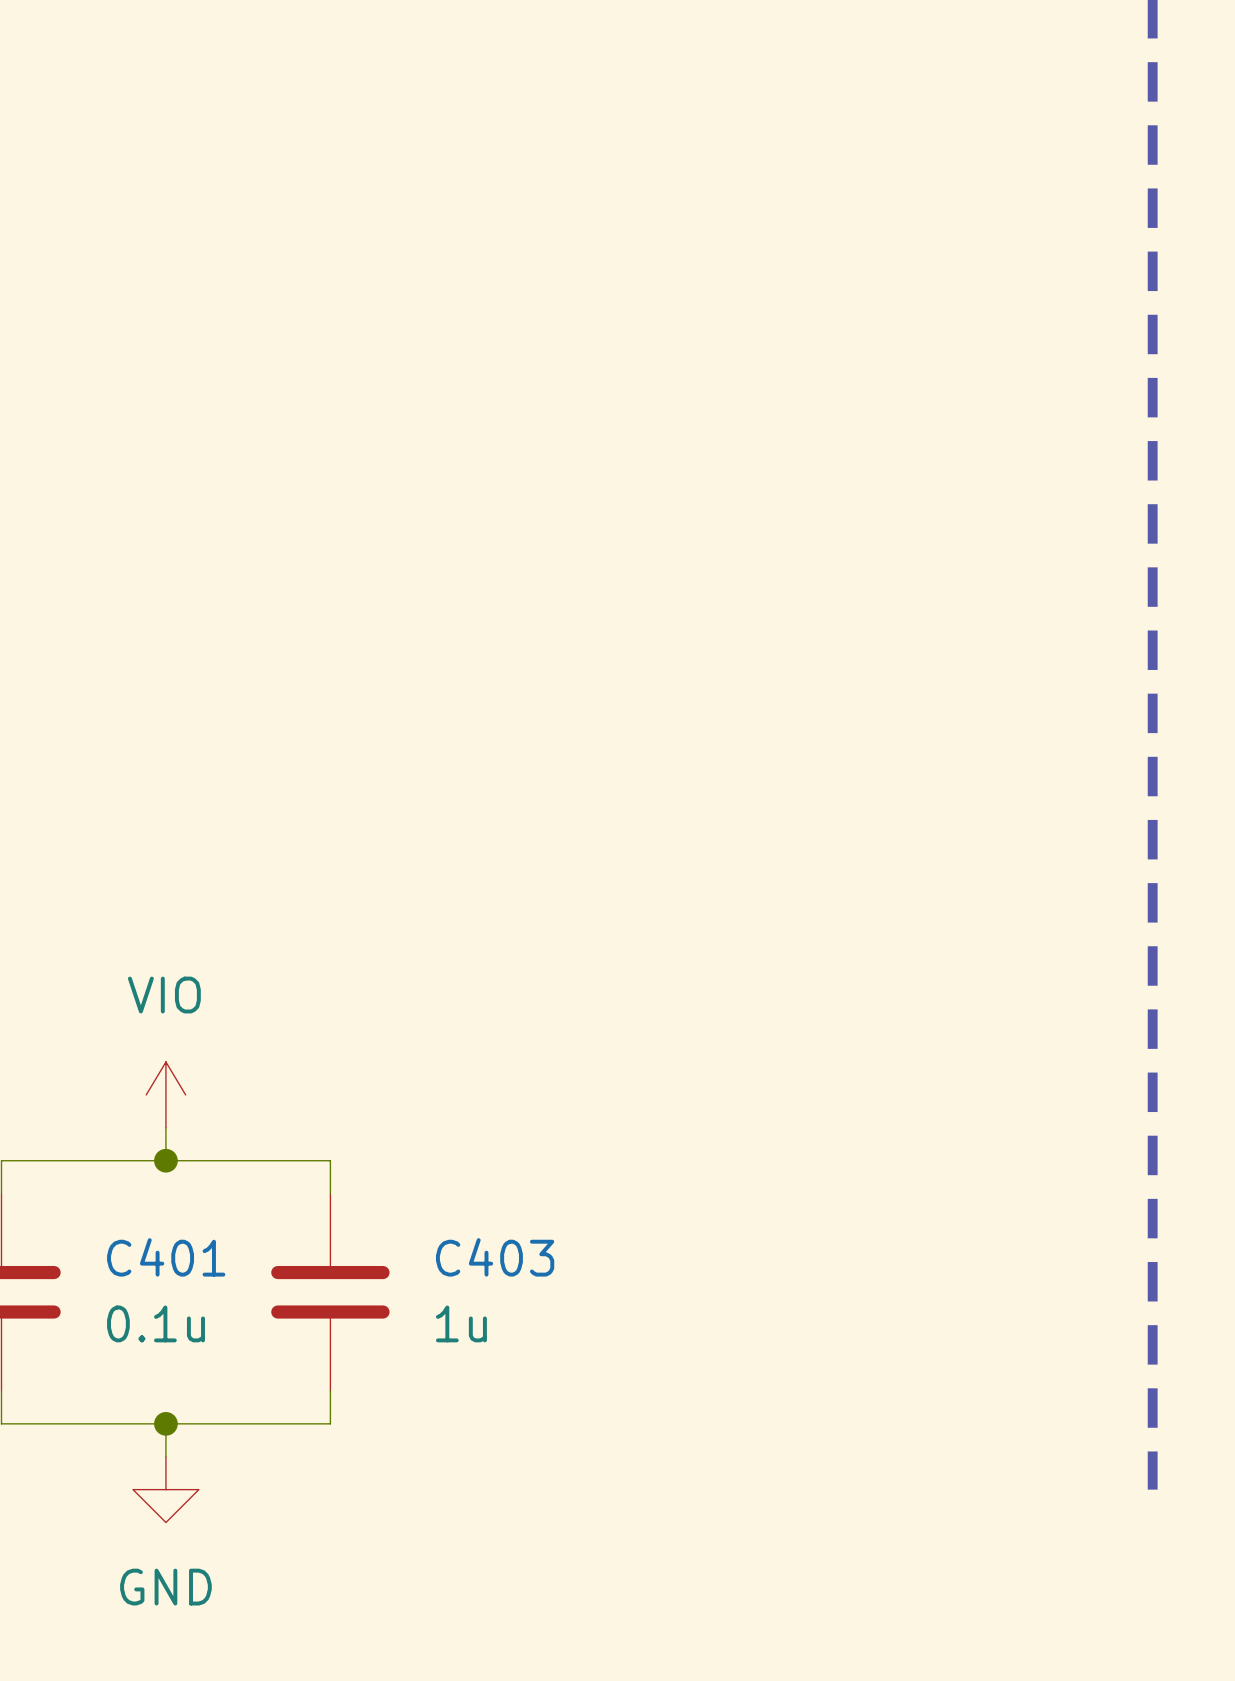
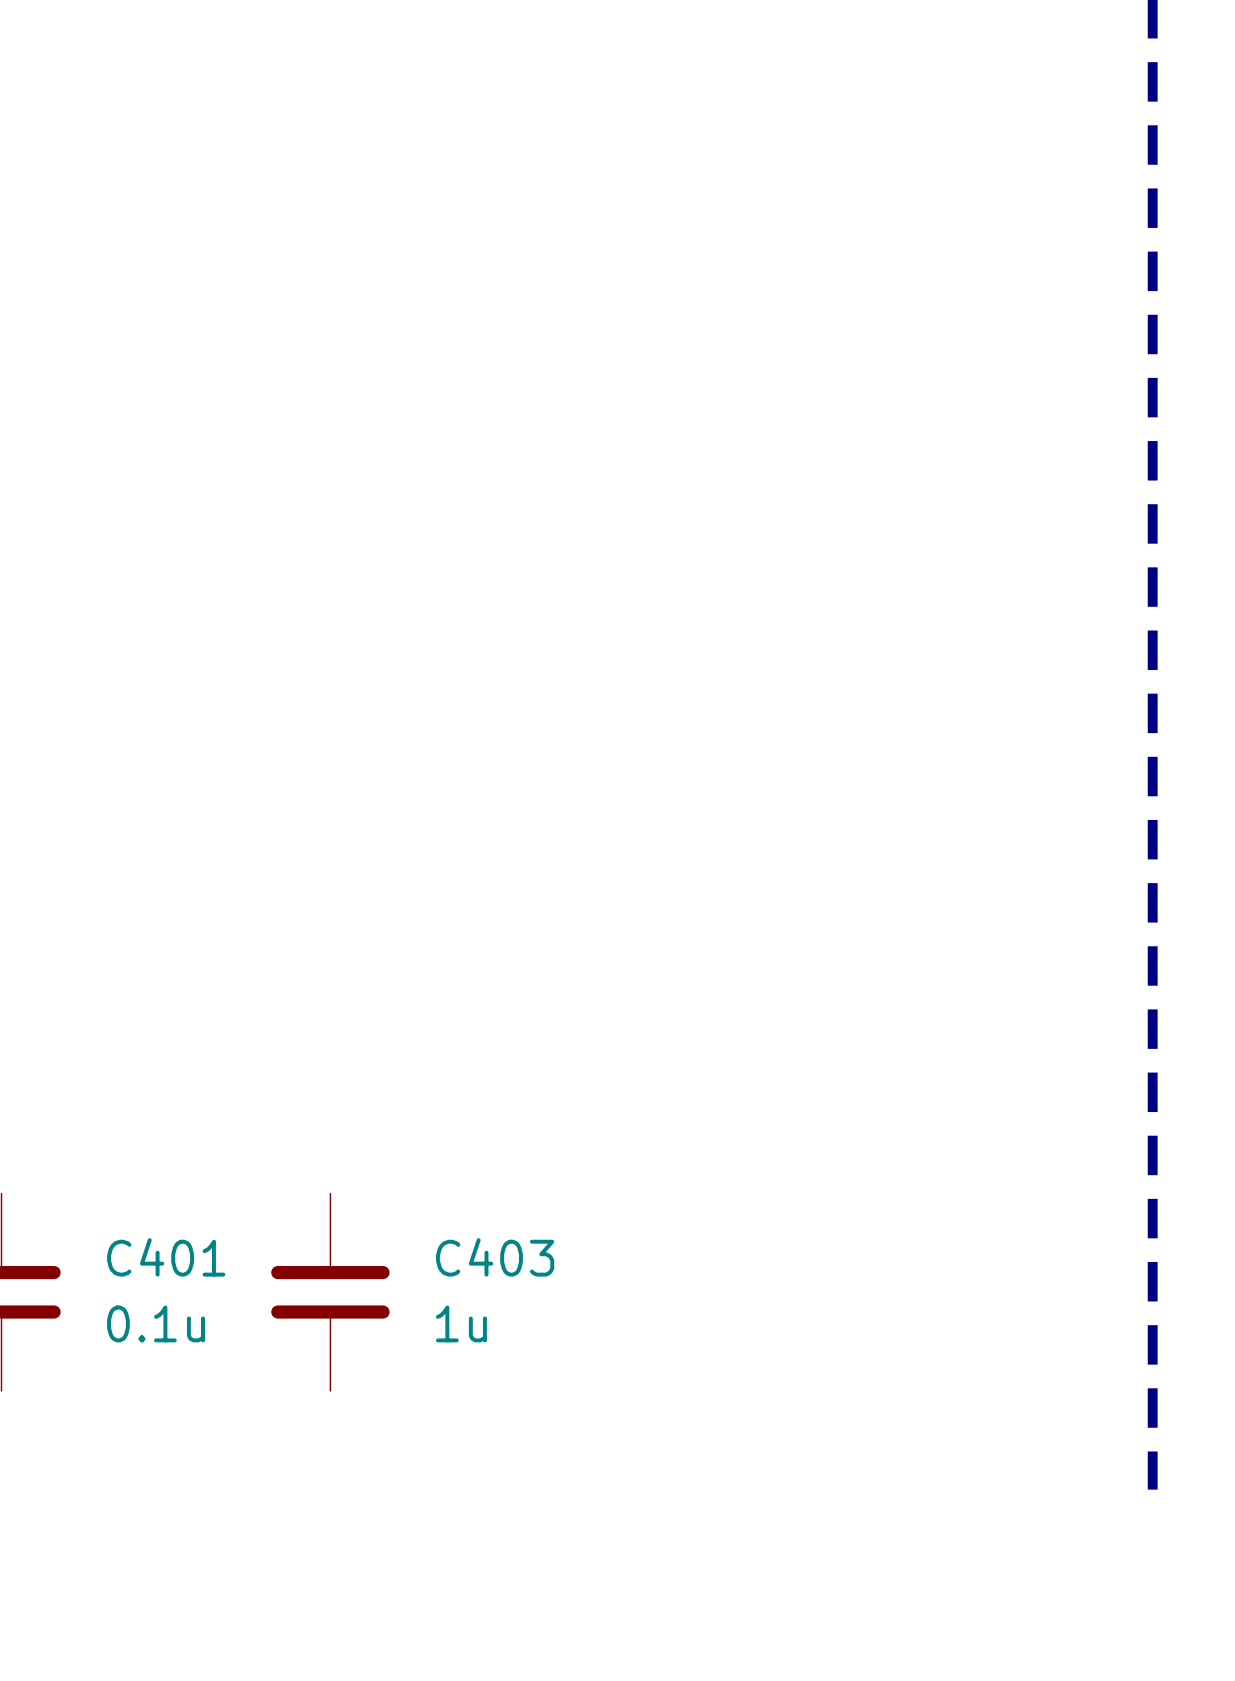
power symbol: VIO (165, 1094) -> none
wire: (165, 1127) (165, 1160) -> none
junction: (165, 1160) -> none
wire: (1, 1193) (1, 1160) (330, 1160) (330, 1193) -> none
wire: (1, 1390) (1, 1423) (330, 1423) (330, 1390) -> none
wire: (165, 1423) (165, 1456) -> none
junction: (165, 1423) -> none
power symbol: GND (165, 1489) -> none

